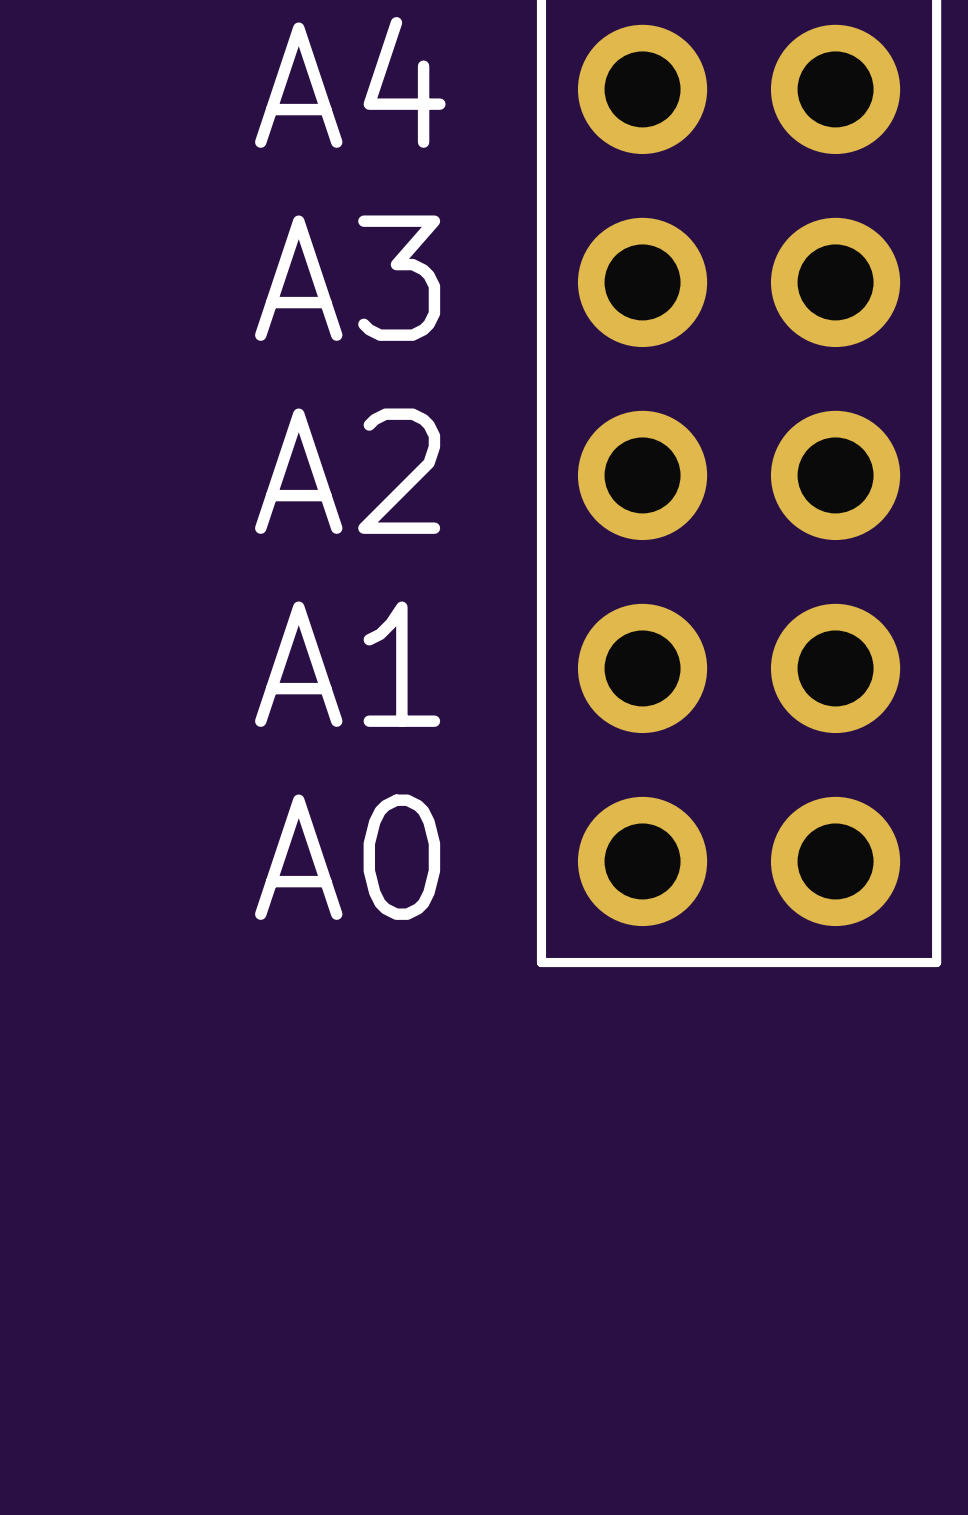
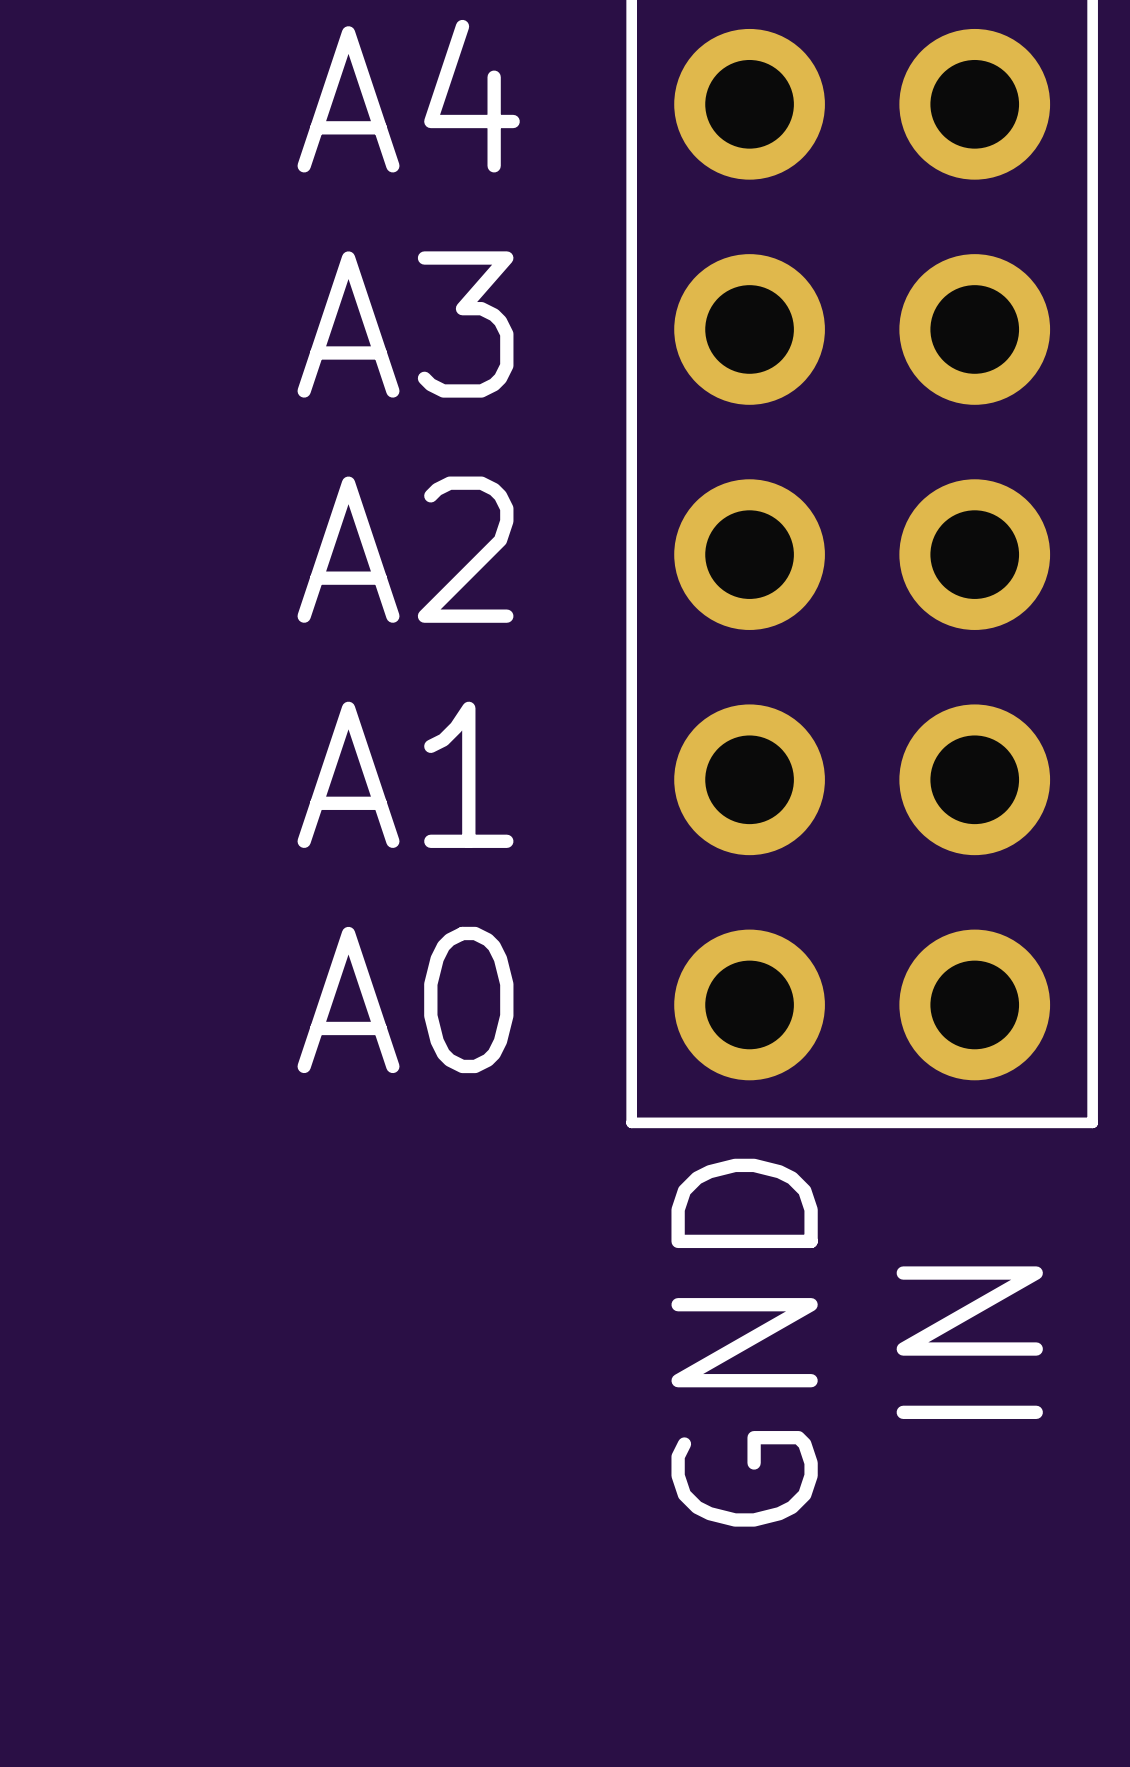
text: none -> GND (744, 1342)
text: none -> IN (969, 1342)

